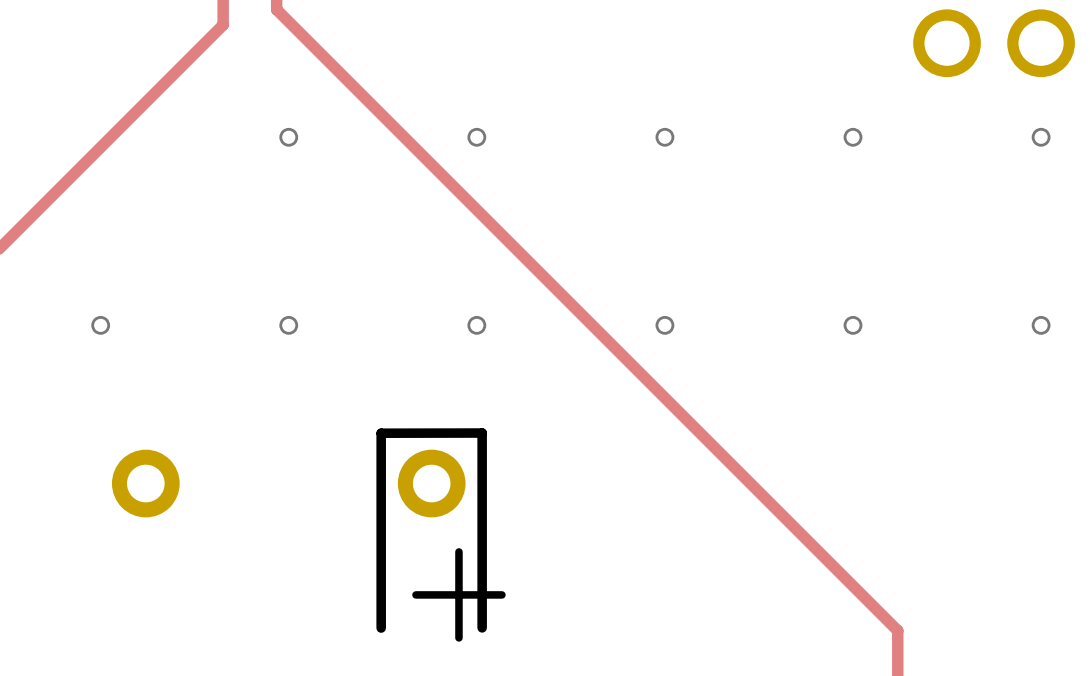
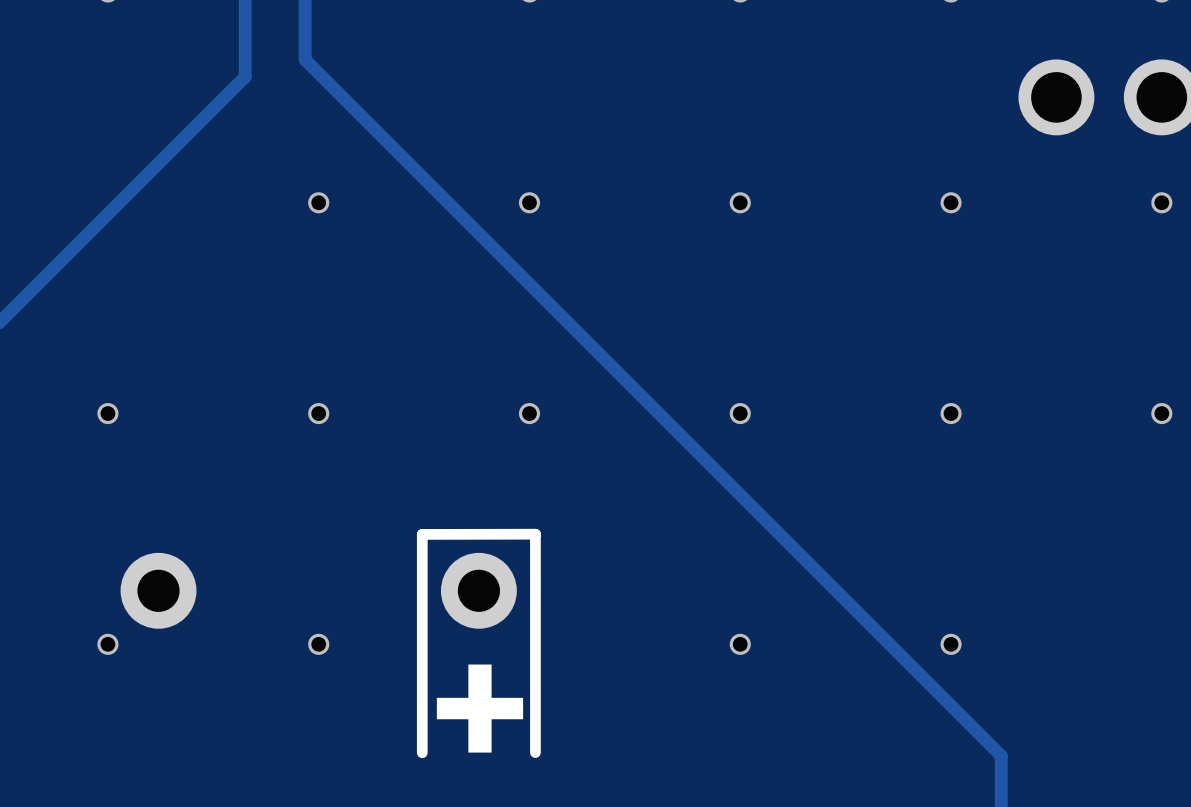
via: none -> (107, 644)
via: none -> (318, 644)
via: none -> (740, 644)
via: none -> (951, 644)

